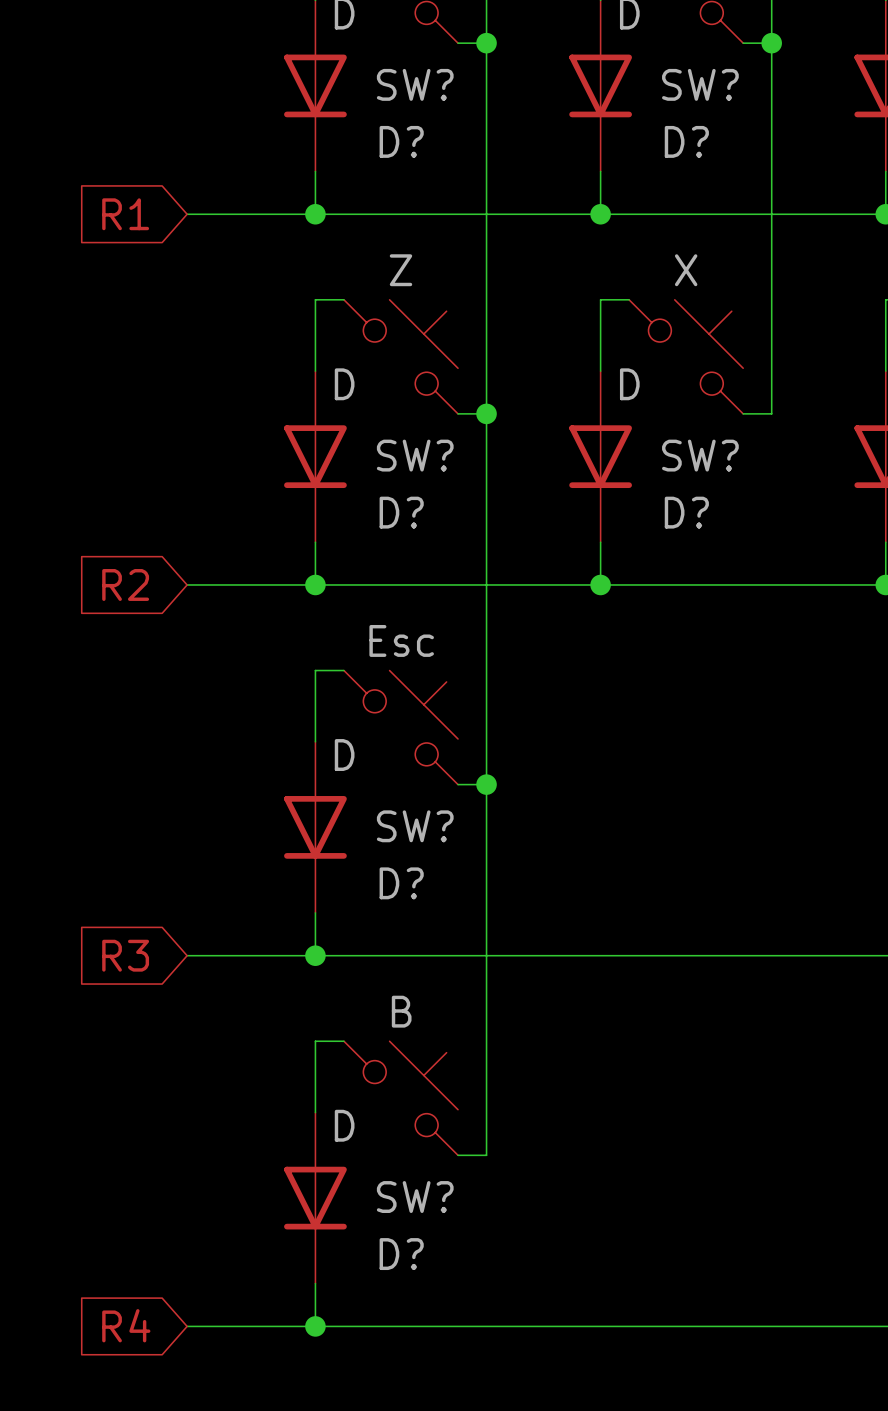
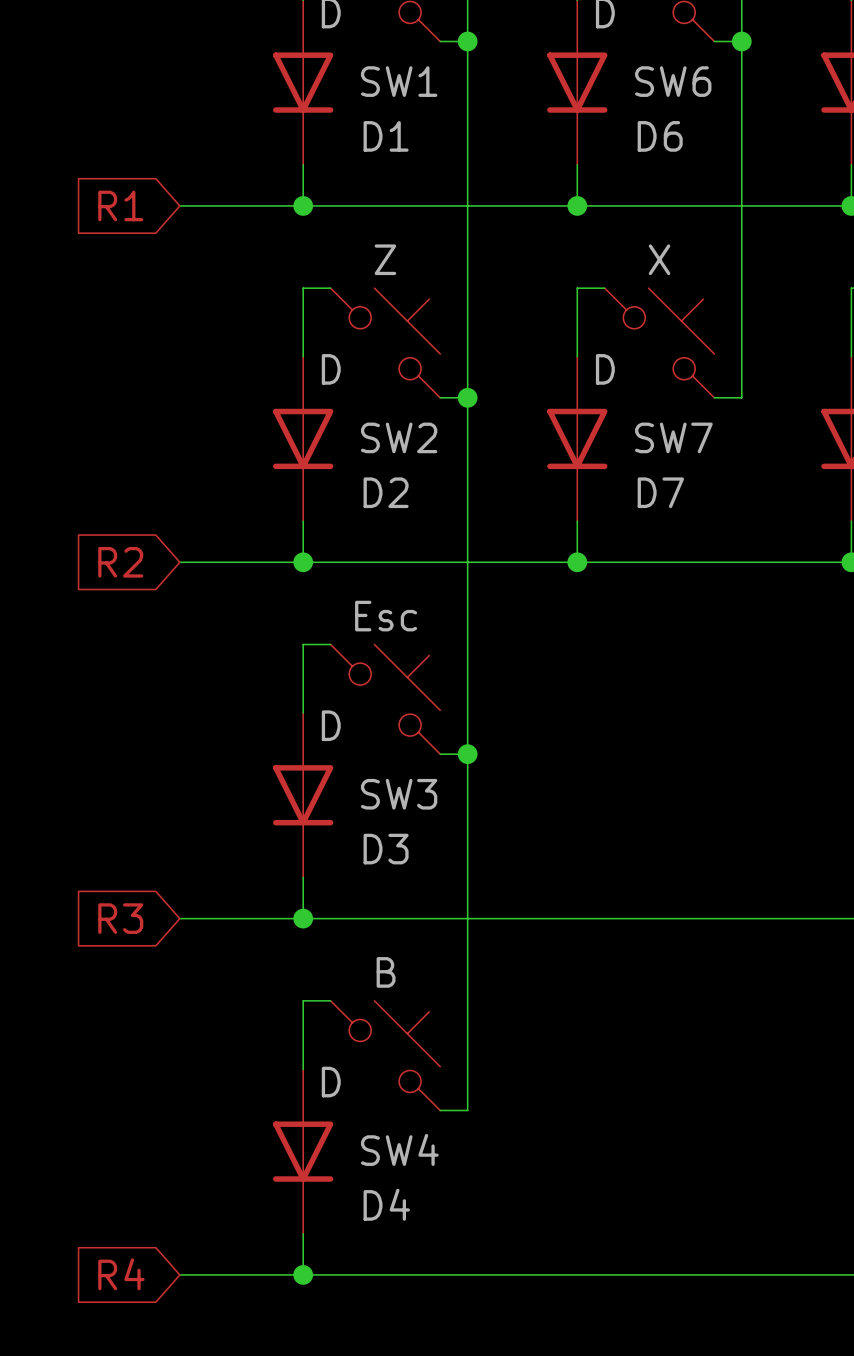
SW? name: SW? (415, 84) -> SW1 (399, 81)
SW? name: SW? (700, 84) -> SW6 (673, 81)
D? name: D? (401, 141) -> D1 (386, 136)
D? name: D? (686, 141) -> D6 (660, 136)
SW? name: SW? (415, 455) -> SW2 (399, 437)
SW? name: SW? (700, 455) -> SW7 (673, 437)
D? name: D? (401, 512) -> D2 (386, 492)
D? name: D? (686, 512) -> D7 (660, 492)
SW? name: SW? (415, 826) -> SW3 (399, 794)
D? name: D? (401, 883) -> D3 (386, 849)
SW? name: SW? (415, 1197) -> SW4 (399, 1149)
D? name: D? (401, 1254) -> D4 (386, 1204)

